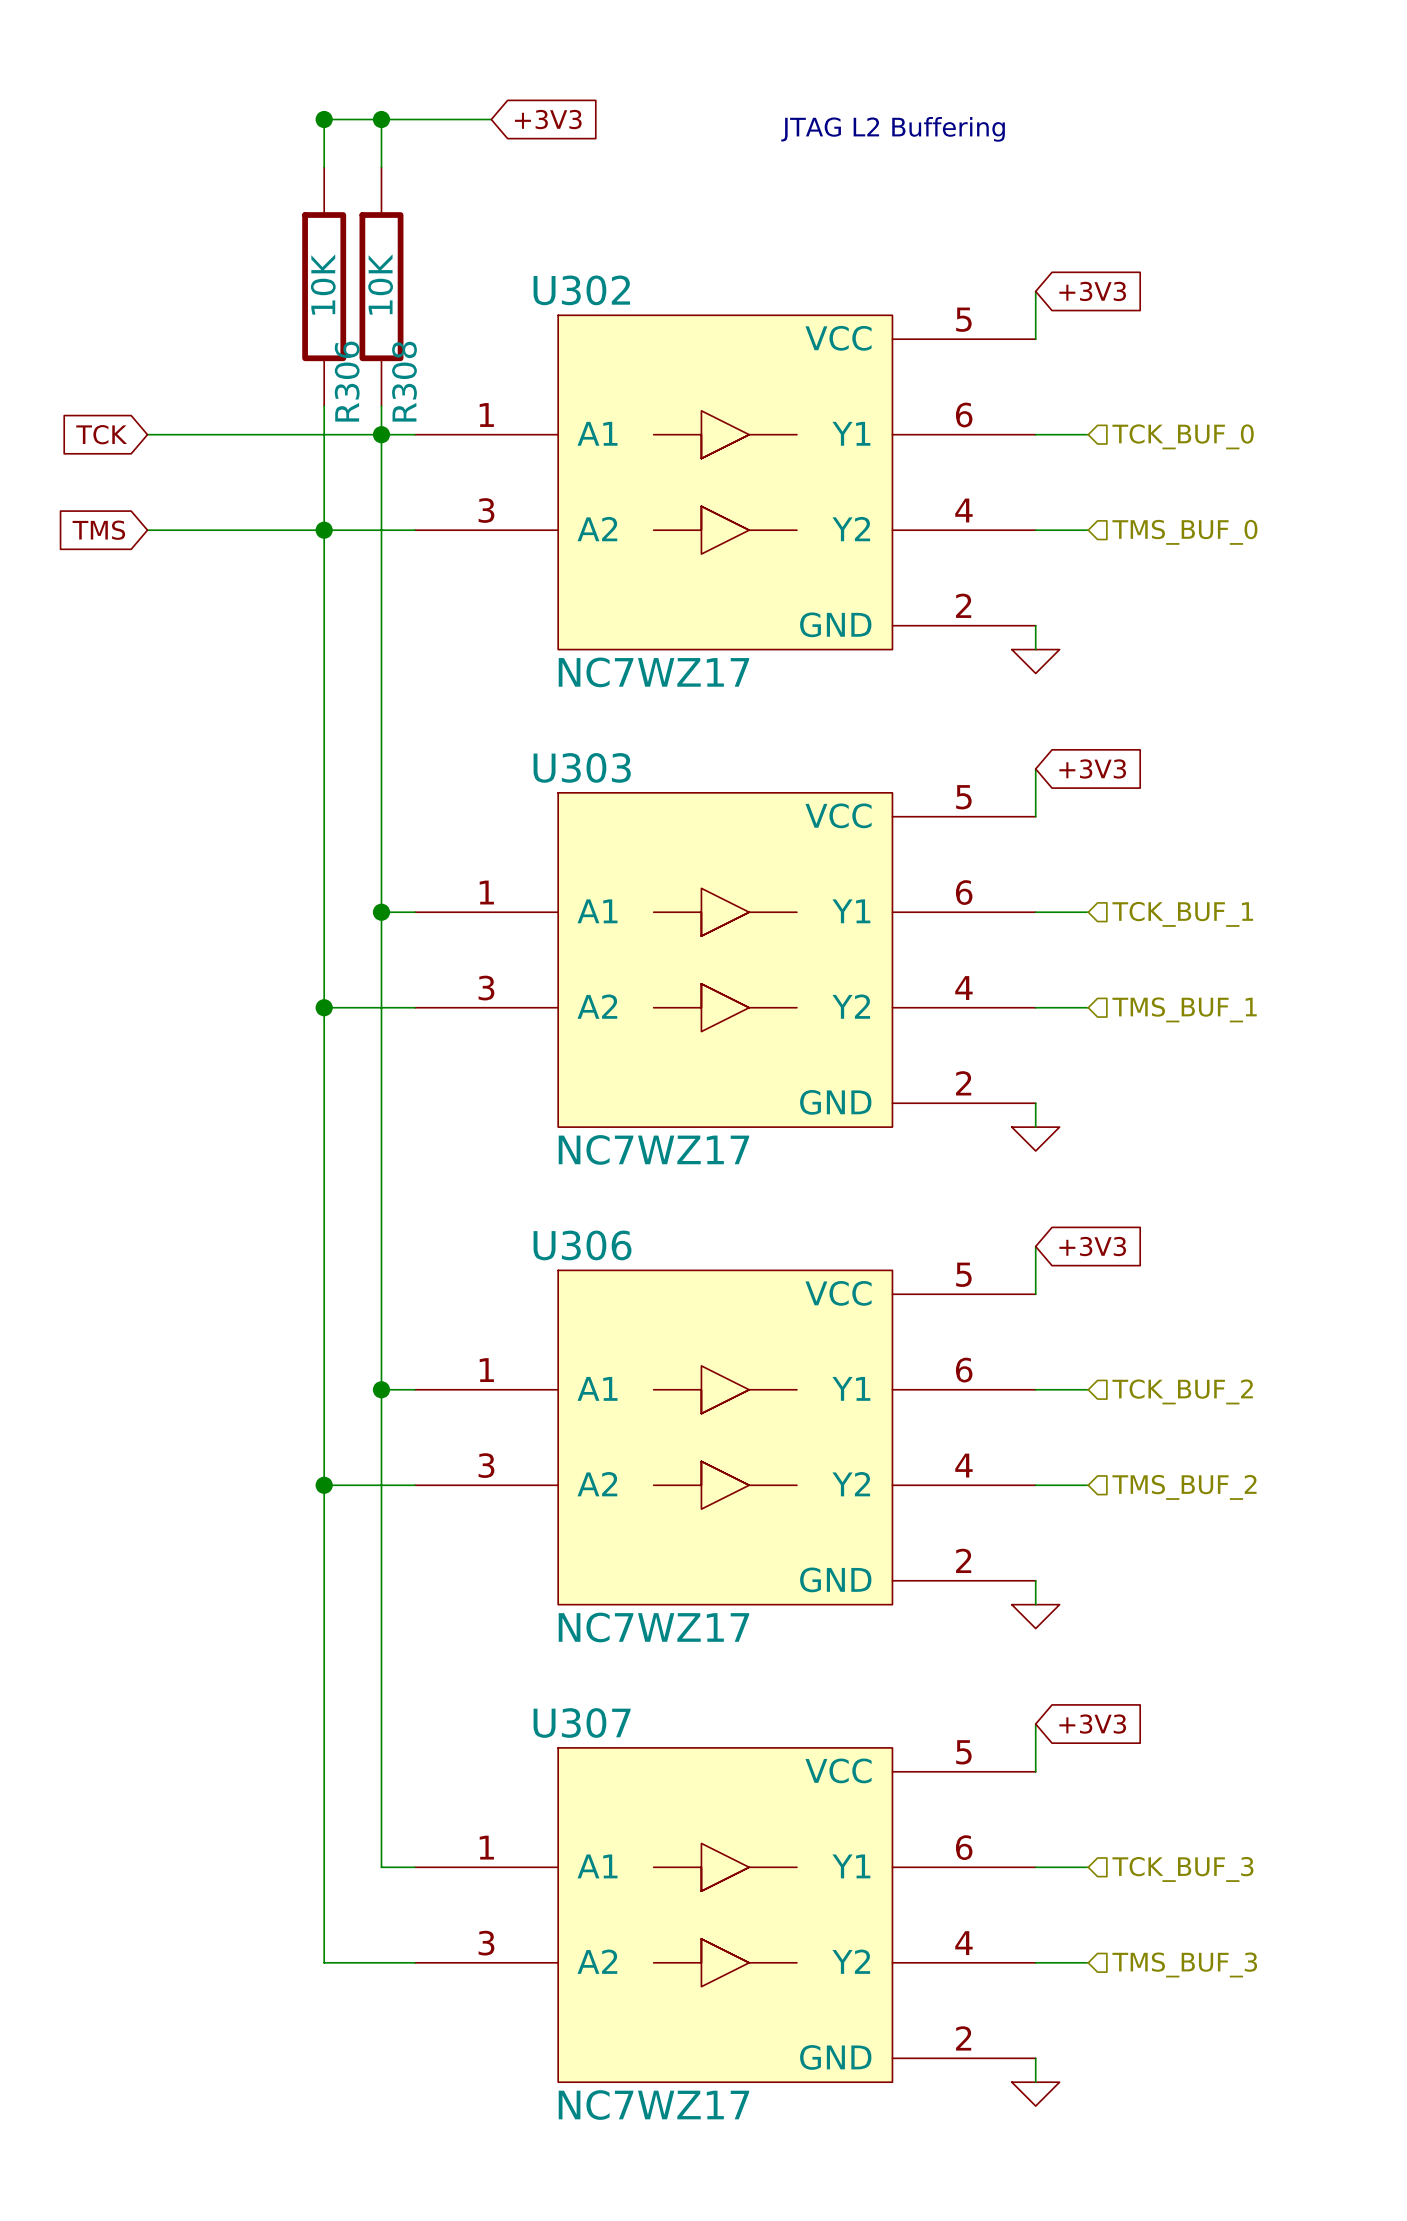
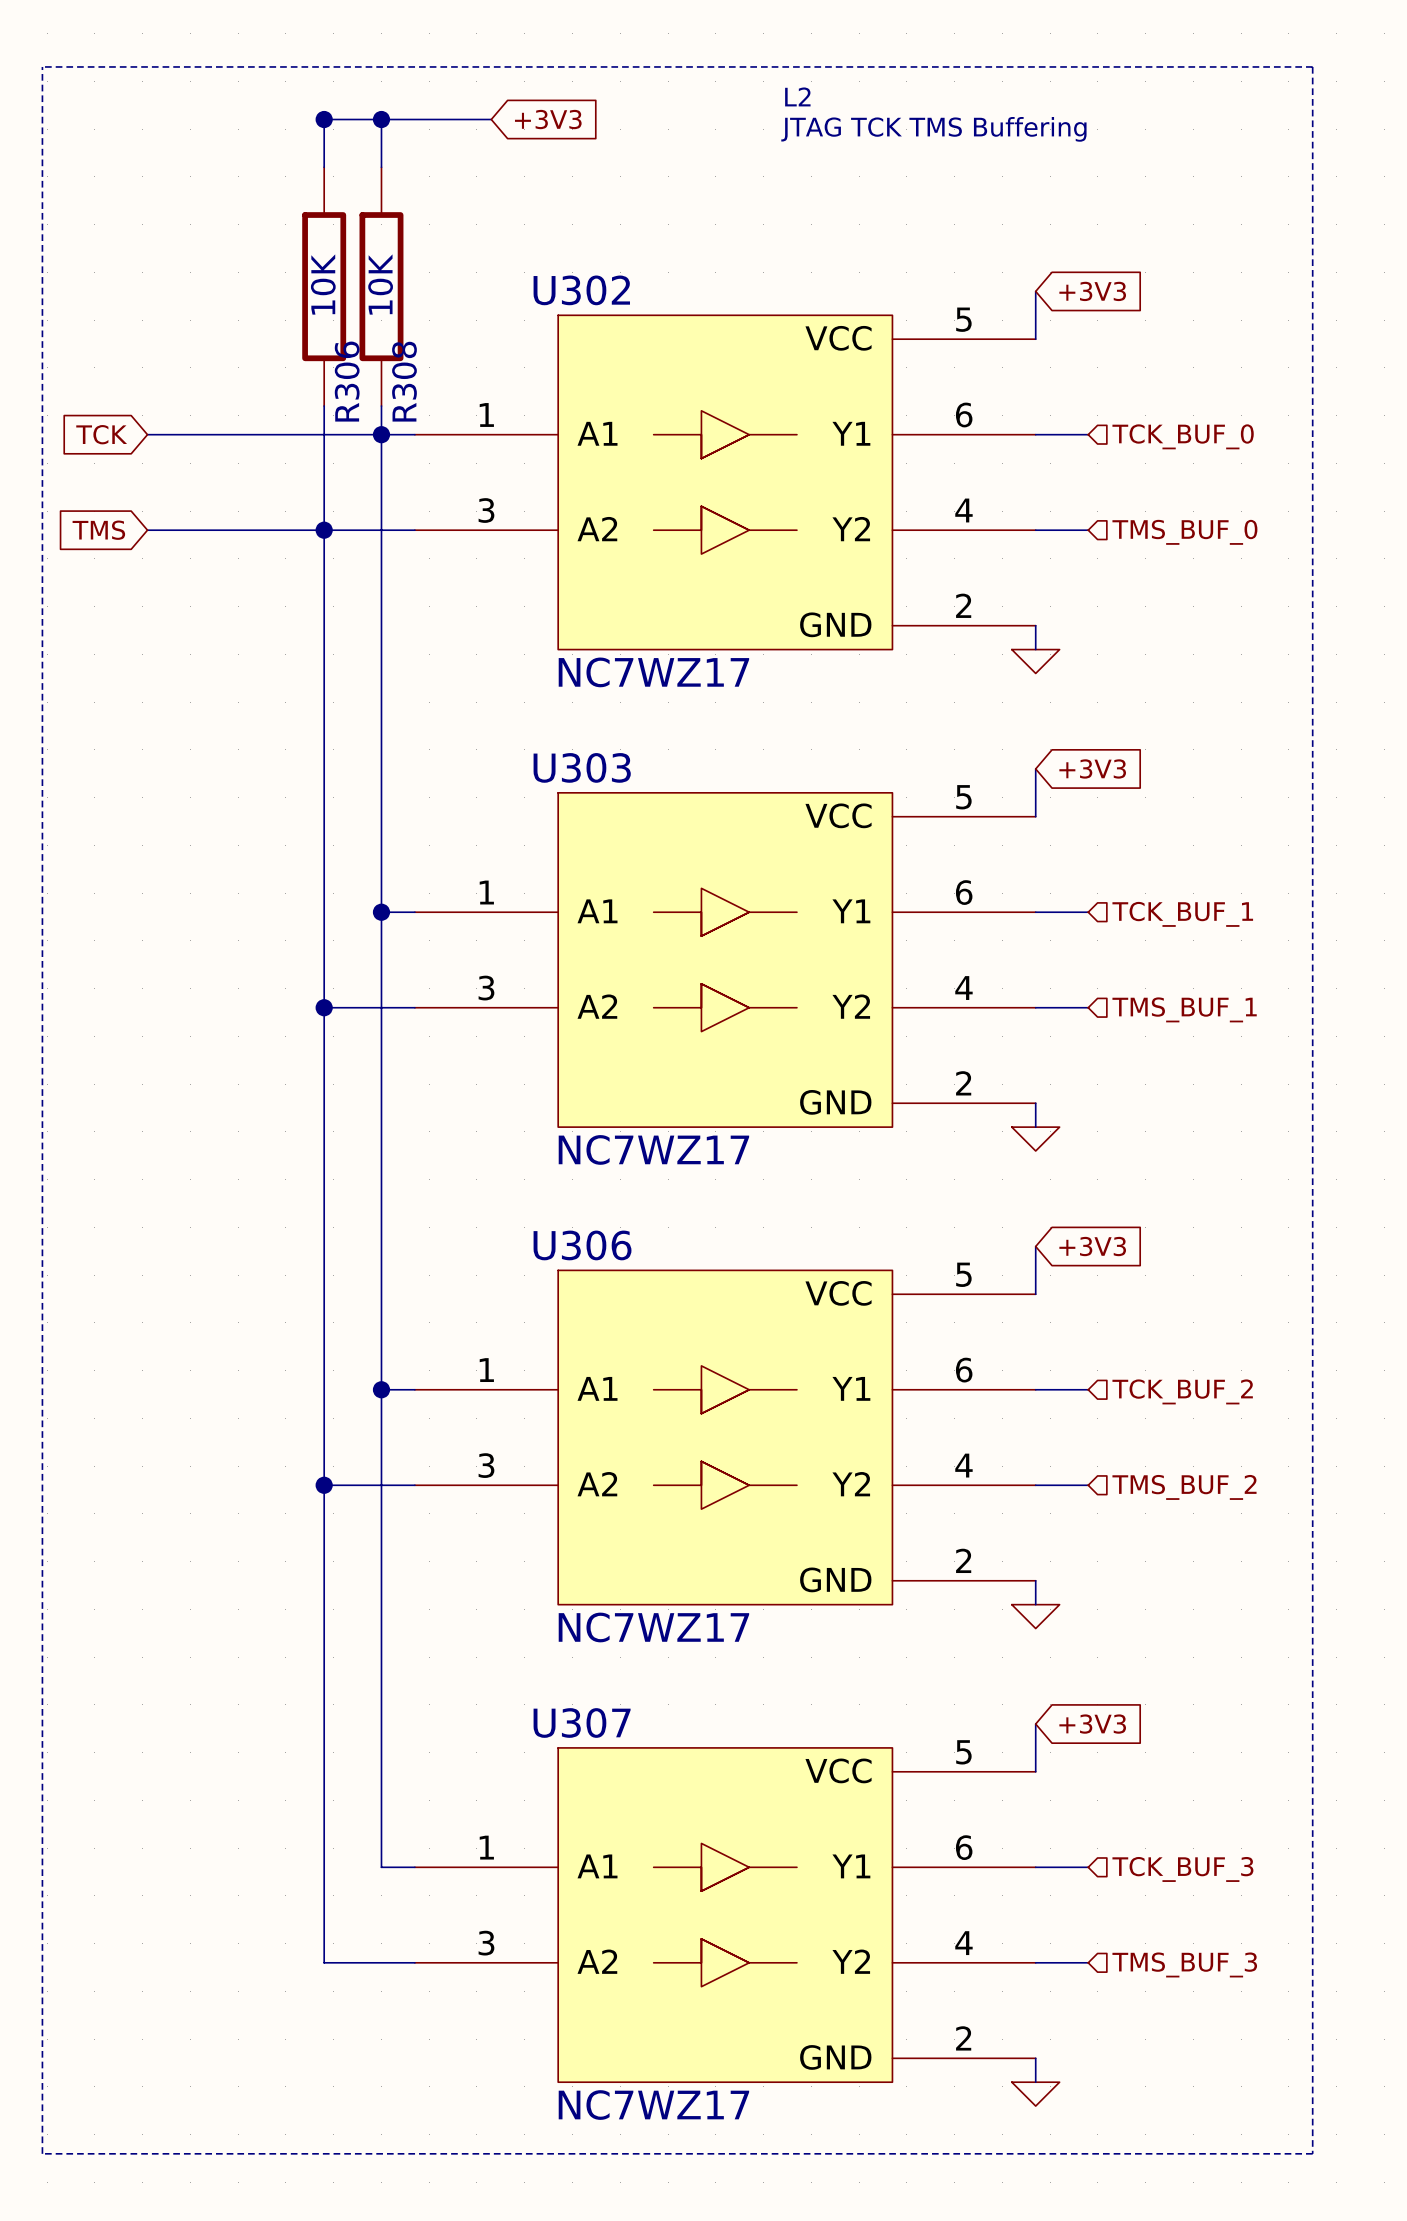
line: none -> (42, 66) (1312, 66) (1312, 2153) (42, 2153) (42, 66)
text: none -> L2 (797, 96)
text: JTAG L2 Buffering (893, 129) -> JTAG TCK TMS Buffering (933, 129)

